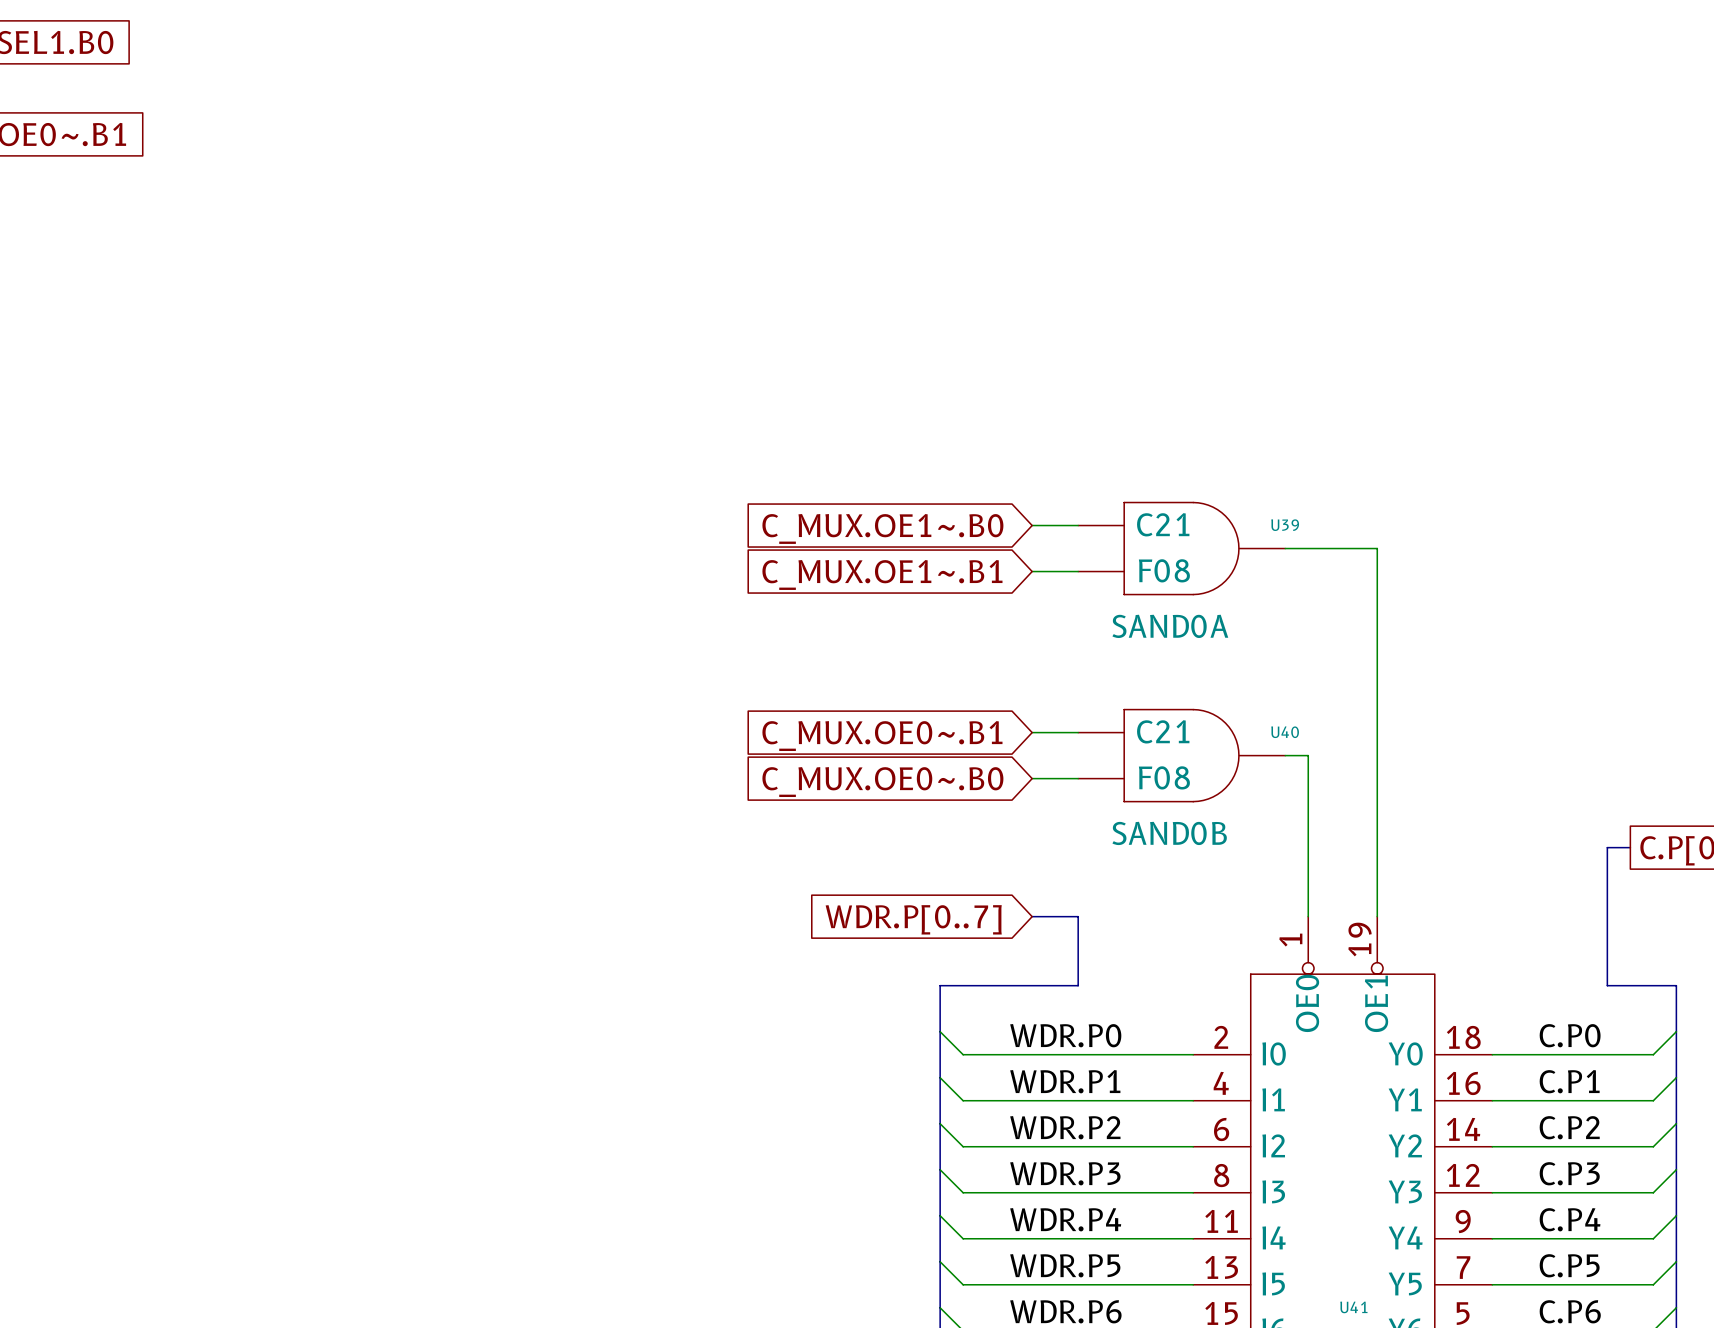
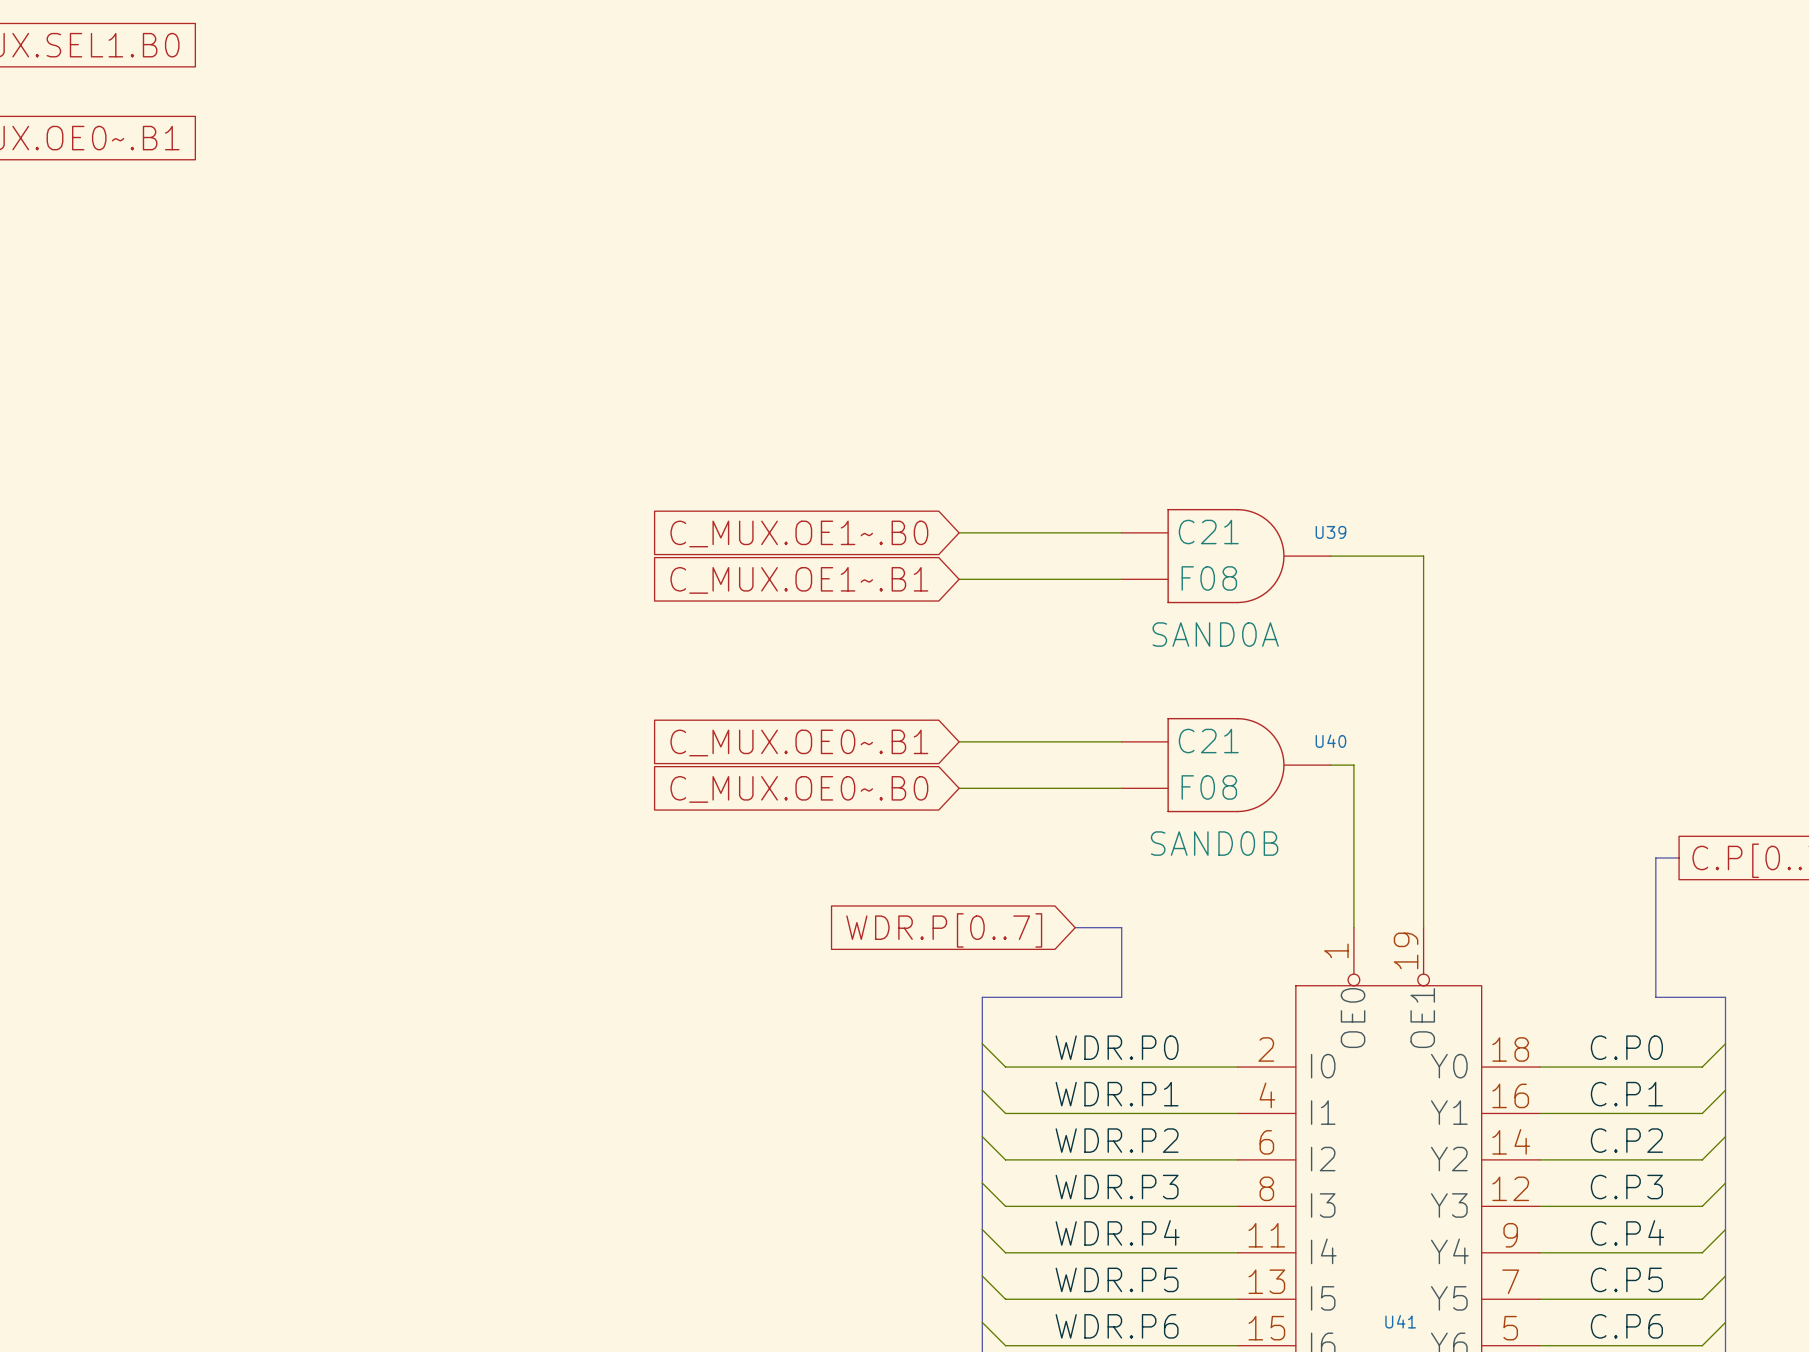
wire: none -> (959, 532) (1075, 532)
global label position: C_MUX.OE1~.B0 (882, 528) -> C_MUX.OE1~.B0 (799, 533)
wire: none -> (959, 579) (1075, 579)
global label position: C_MUX.OE1~.B1 (882, 574) -> C_MUX.OE1~.B1 (799, 580)
wire: none -> (959, 741) (1075, 741)
global label position: C_MUX.OE0~.B1 (882, 736) -> C_MUX.OE0~.B1 (799, 742)
wire: none -> (959, 788) (1075, 788)
global label position: C_MUX.OE0~.B0 (882, 782) -> C_MUX.OE0~.B0 (799, 789)

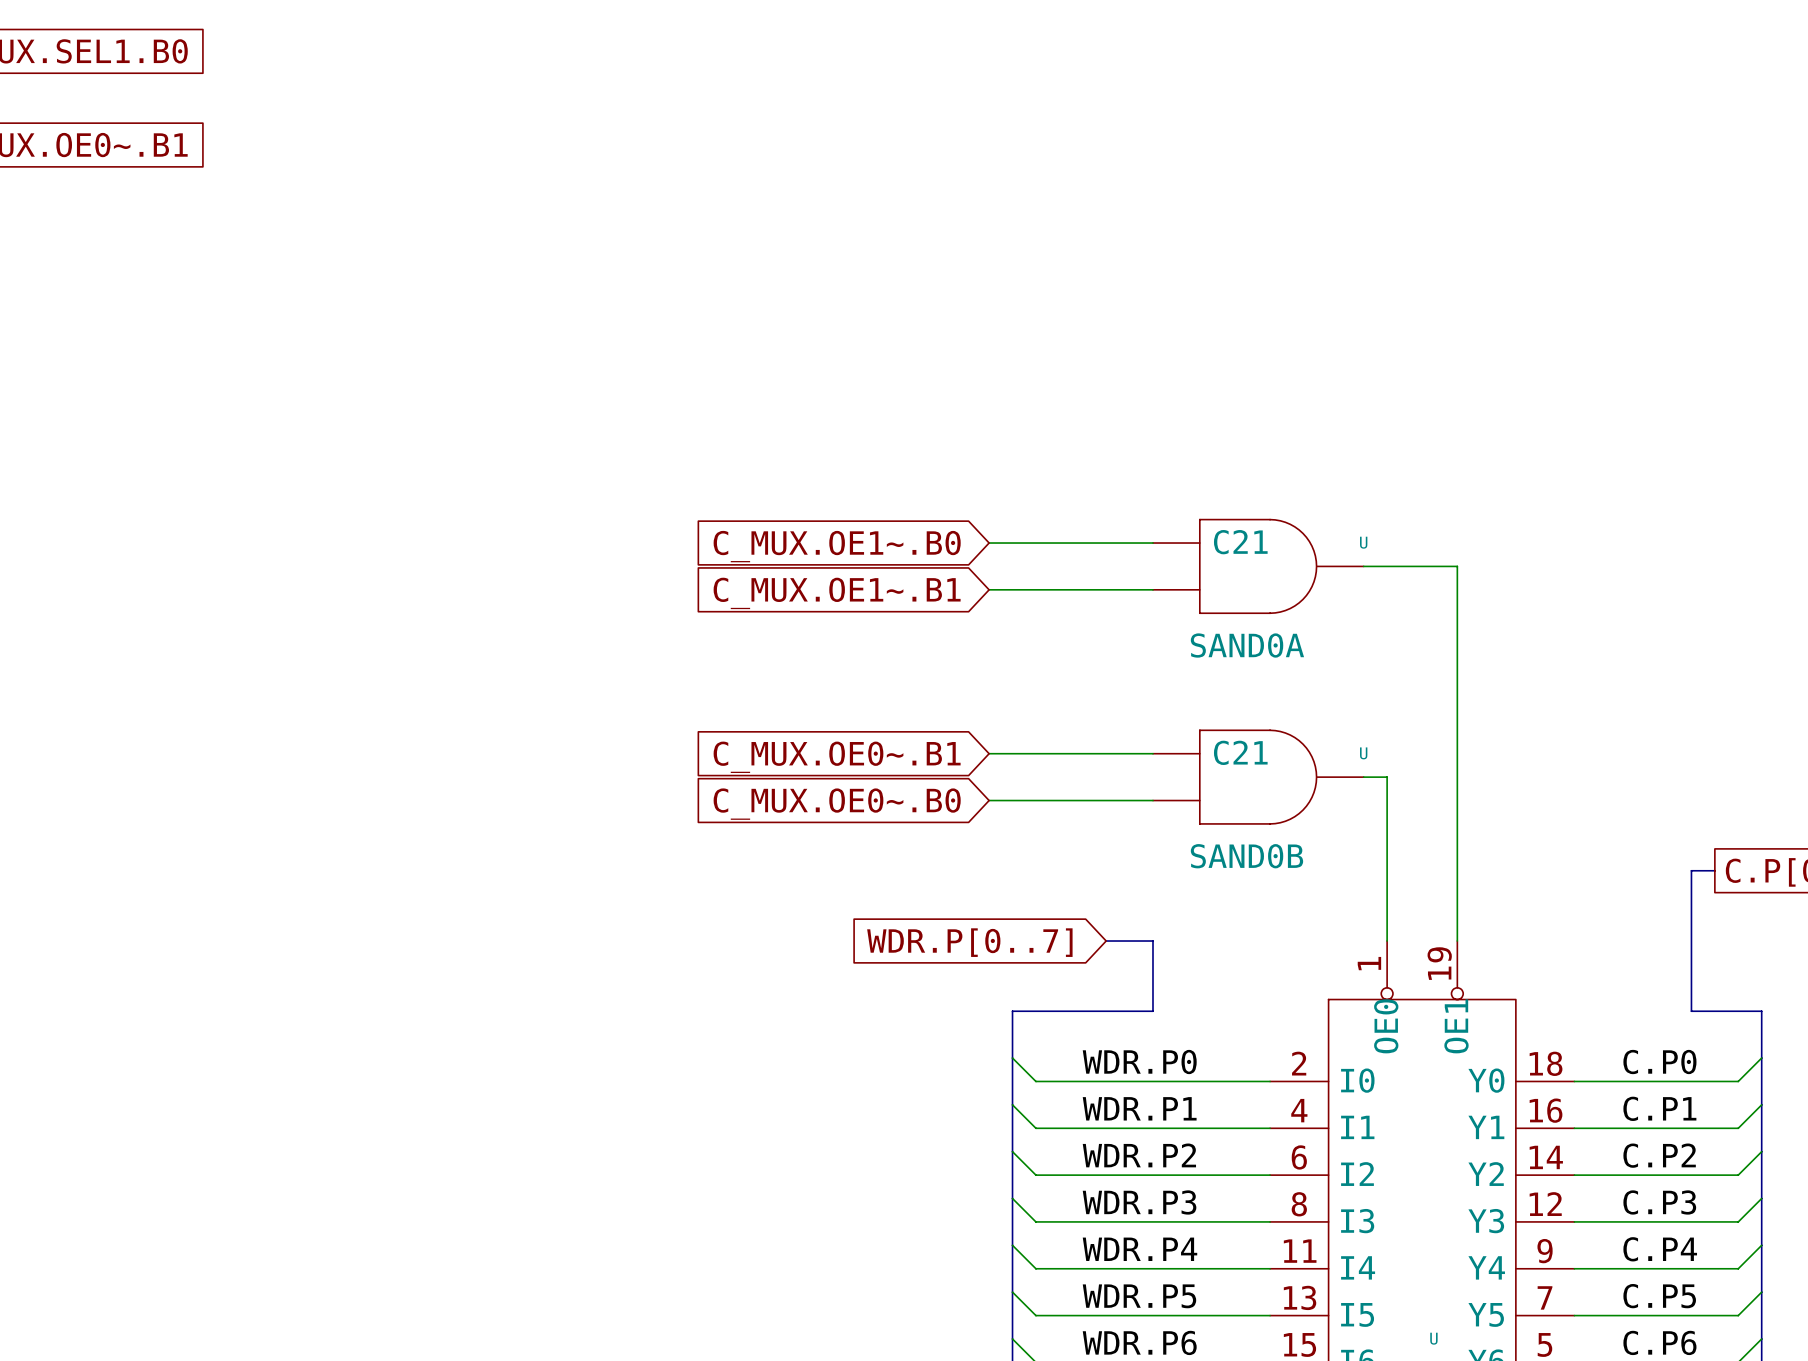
U39 name: U39 (1330, 532) -> U (1363, 542)
U39 value: F08 (1209, 578) -> none
U40 name: U40 (1330, 741) -> U (1363, 753)
U40 value: F08 (1209, 787) -> none
U41 name: U41 (1400, 1321) -> U (1433, 1338)

